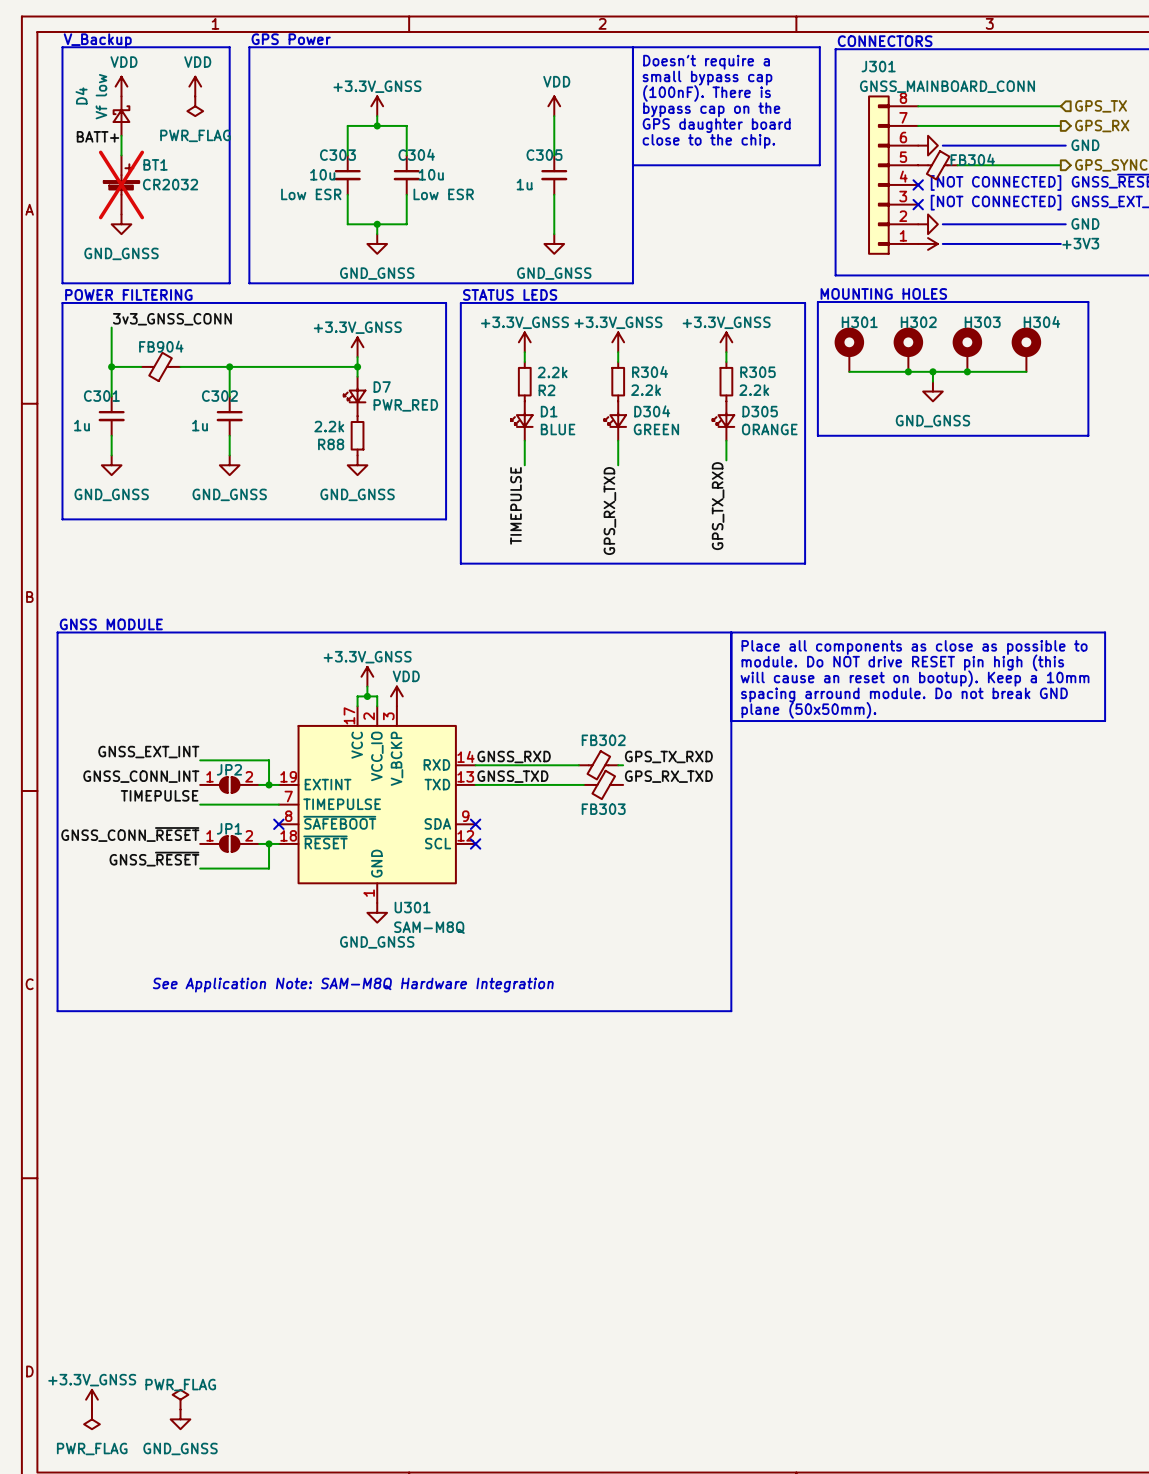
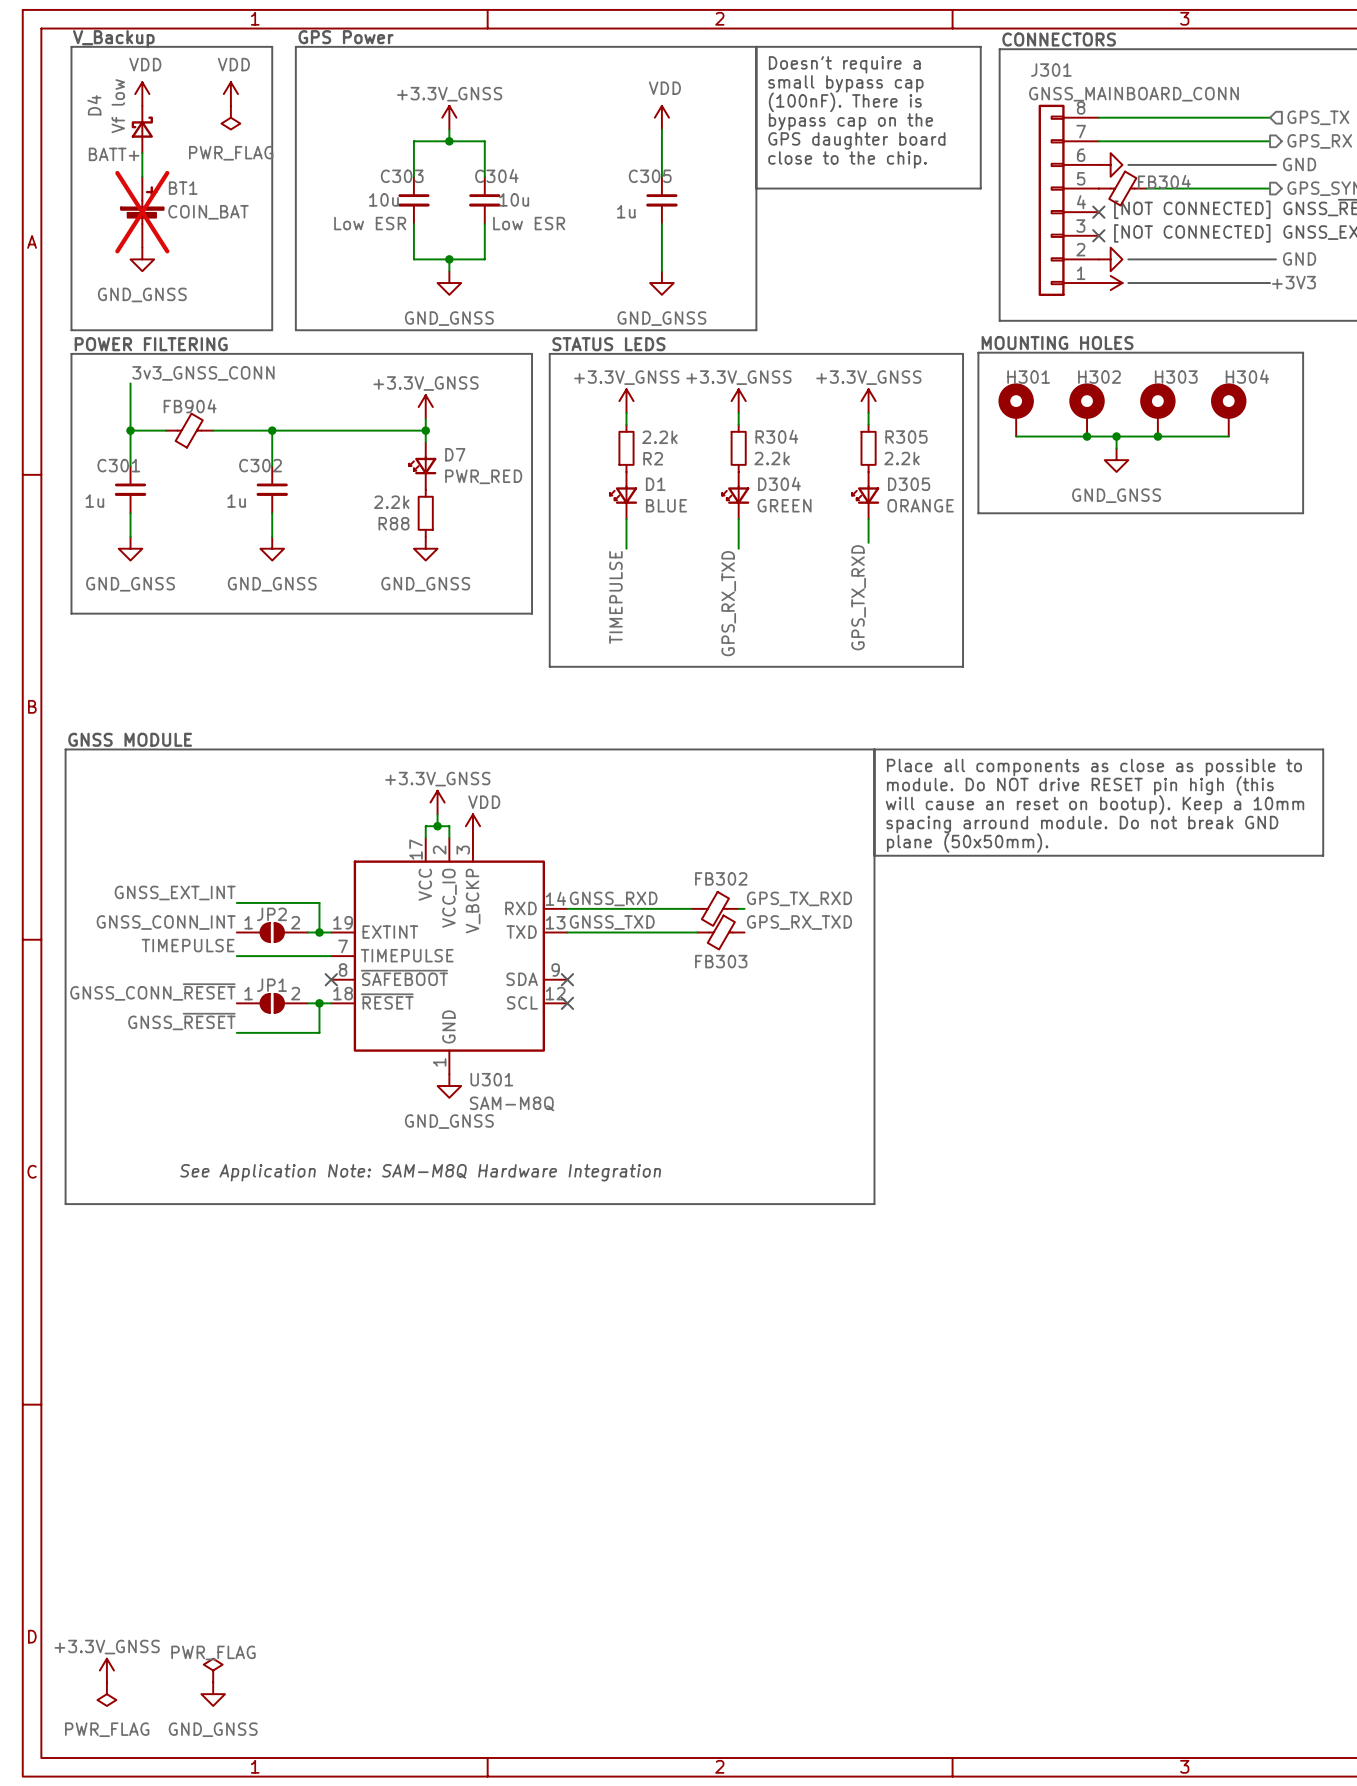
BT1 value: CR2032 (170, 184) -> COIN_BAT (208, 212)

